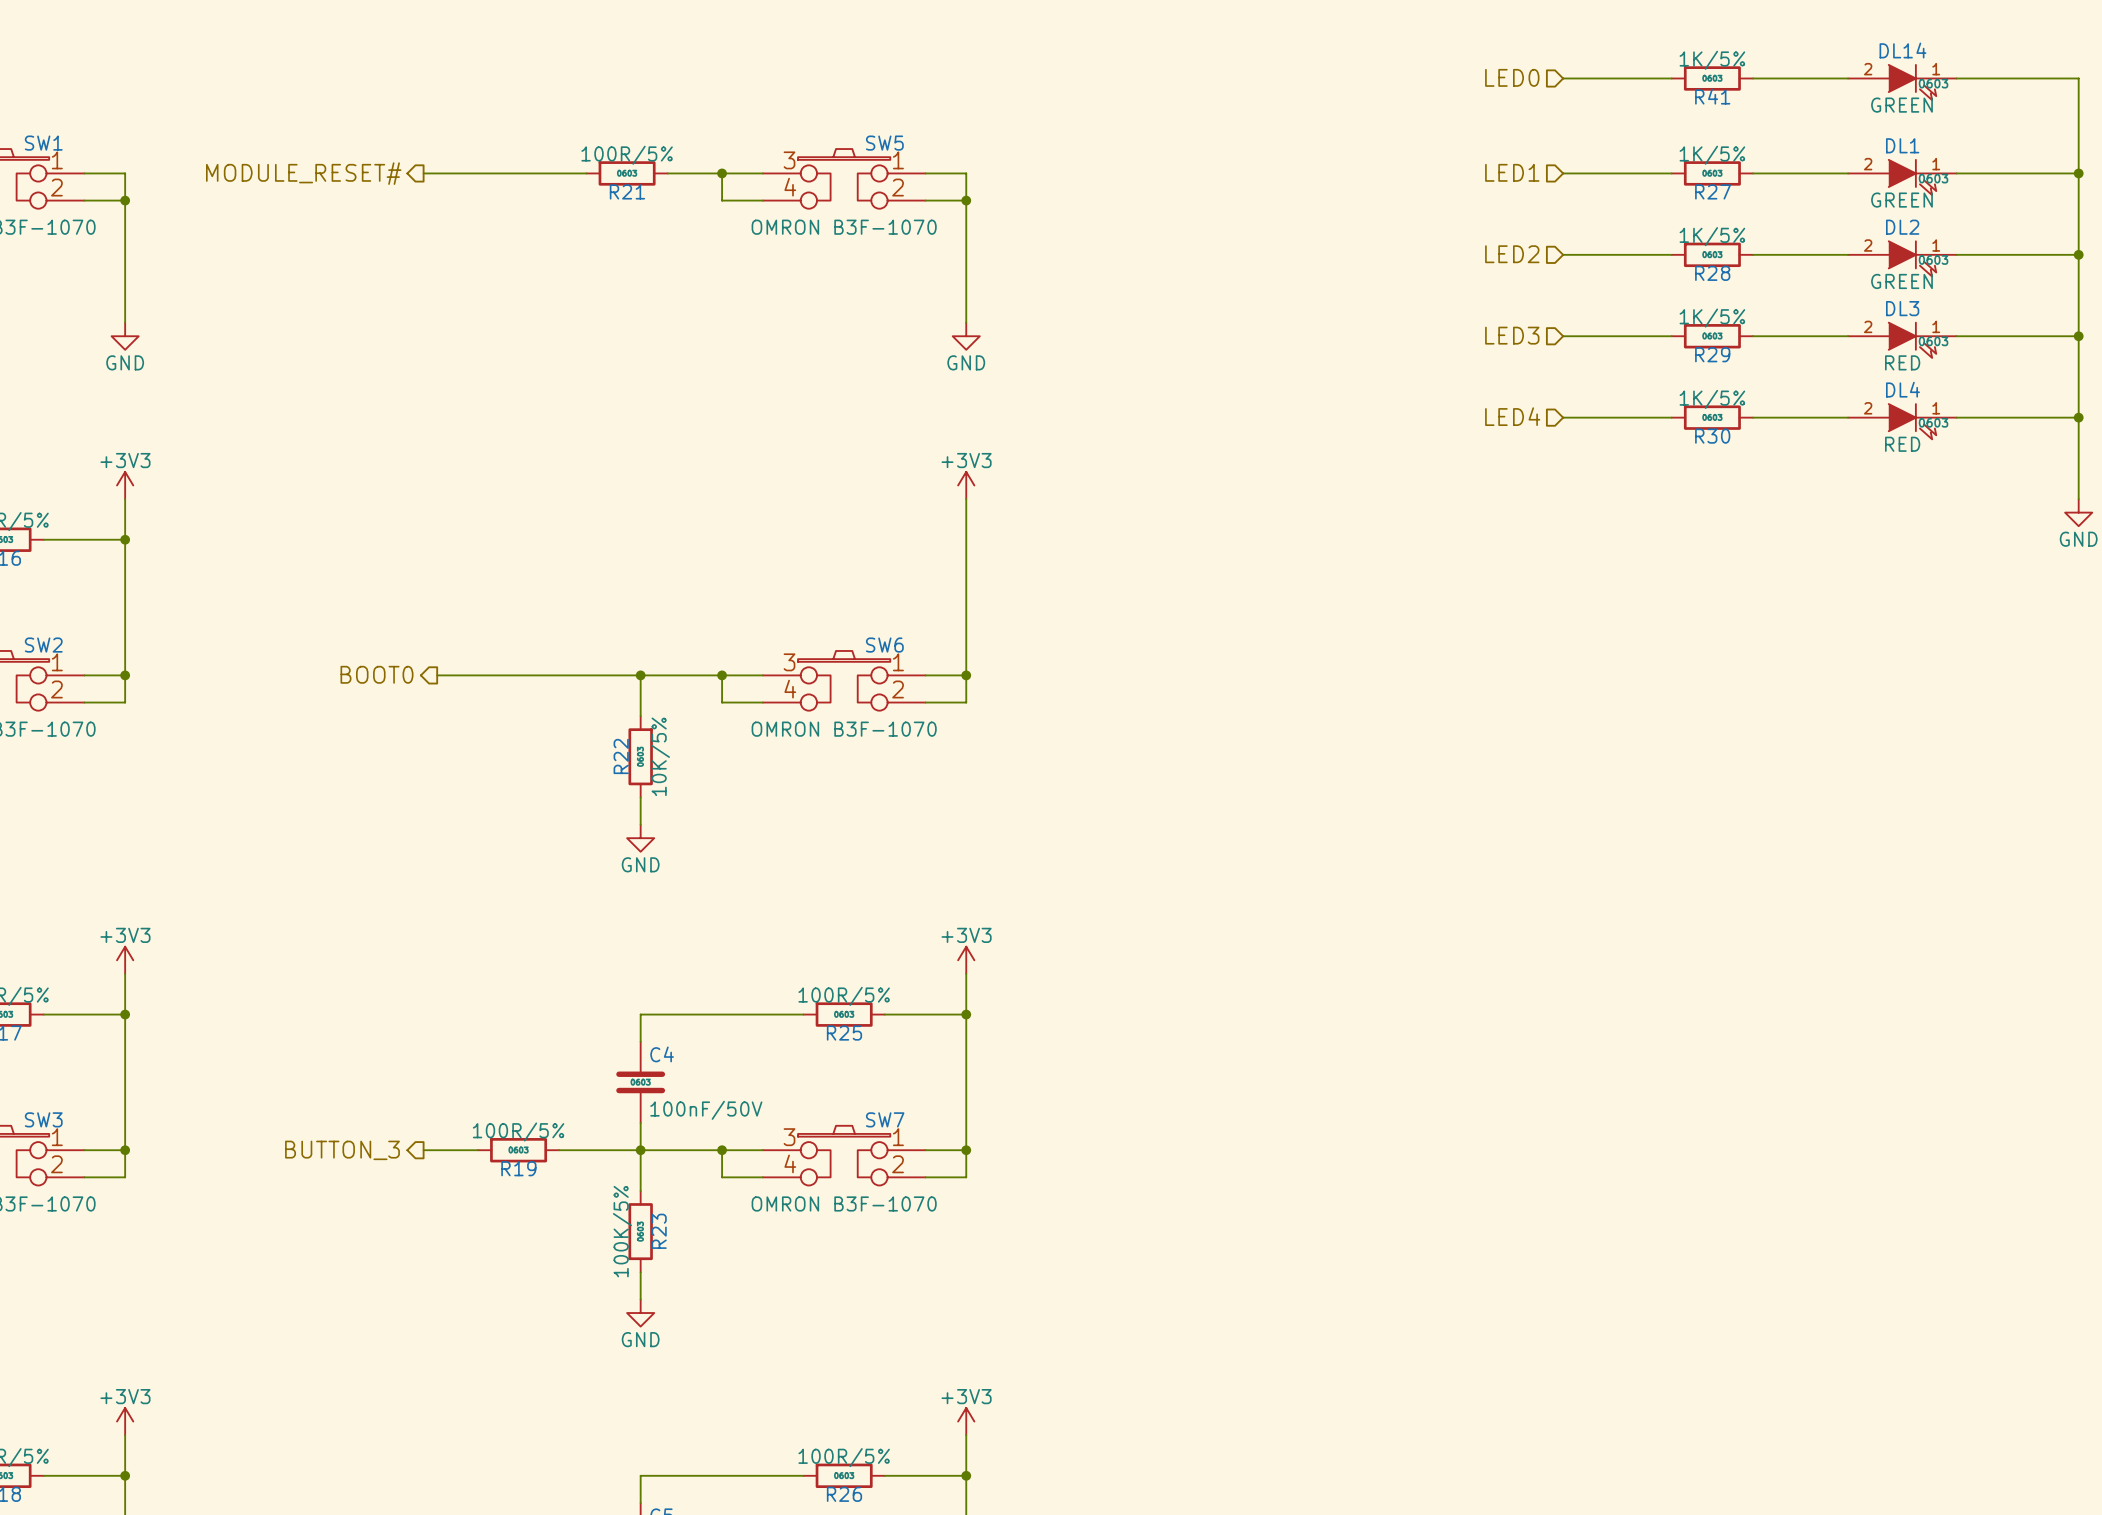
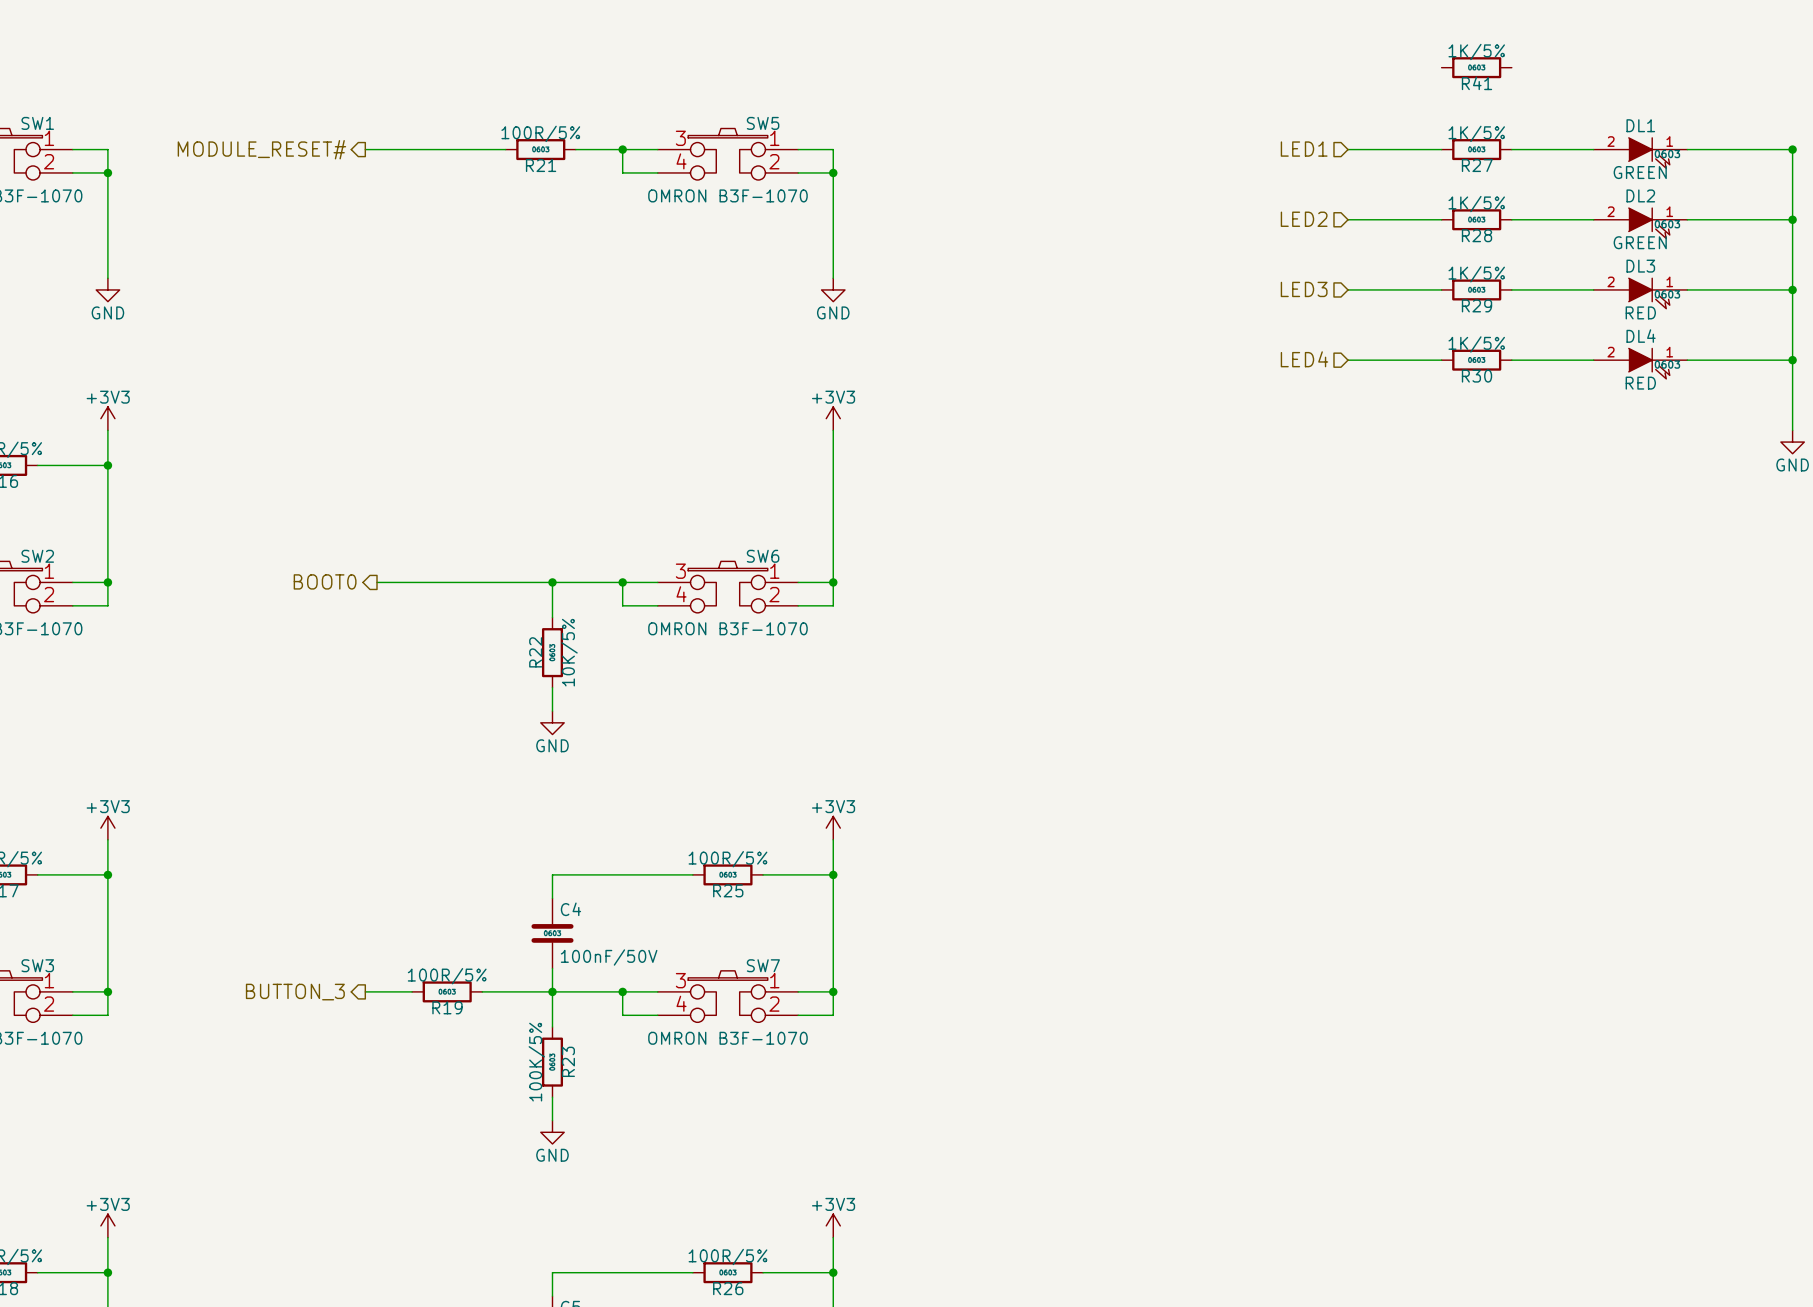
hierarchical label: LED0 (1512, 77) -> none
wire: (1563, 78) (1671, 78) -> none
wire: (1753, 78) (1848, 78) -> none
wire: (1956, 78) (2078, 78) (2078, 173) -> none
DL14: GREEN (1902, 82) -> none

